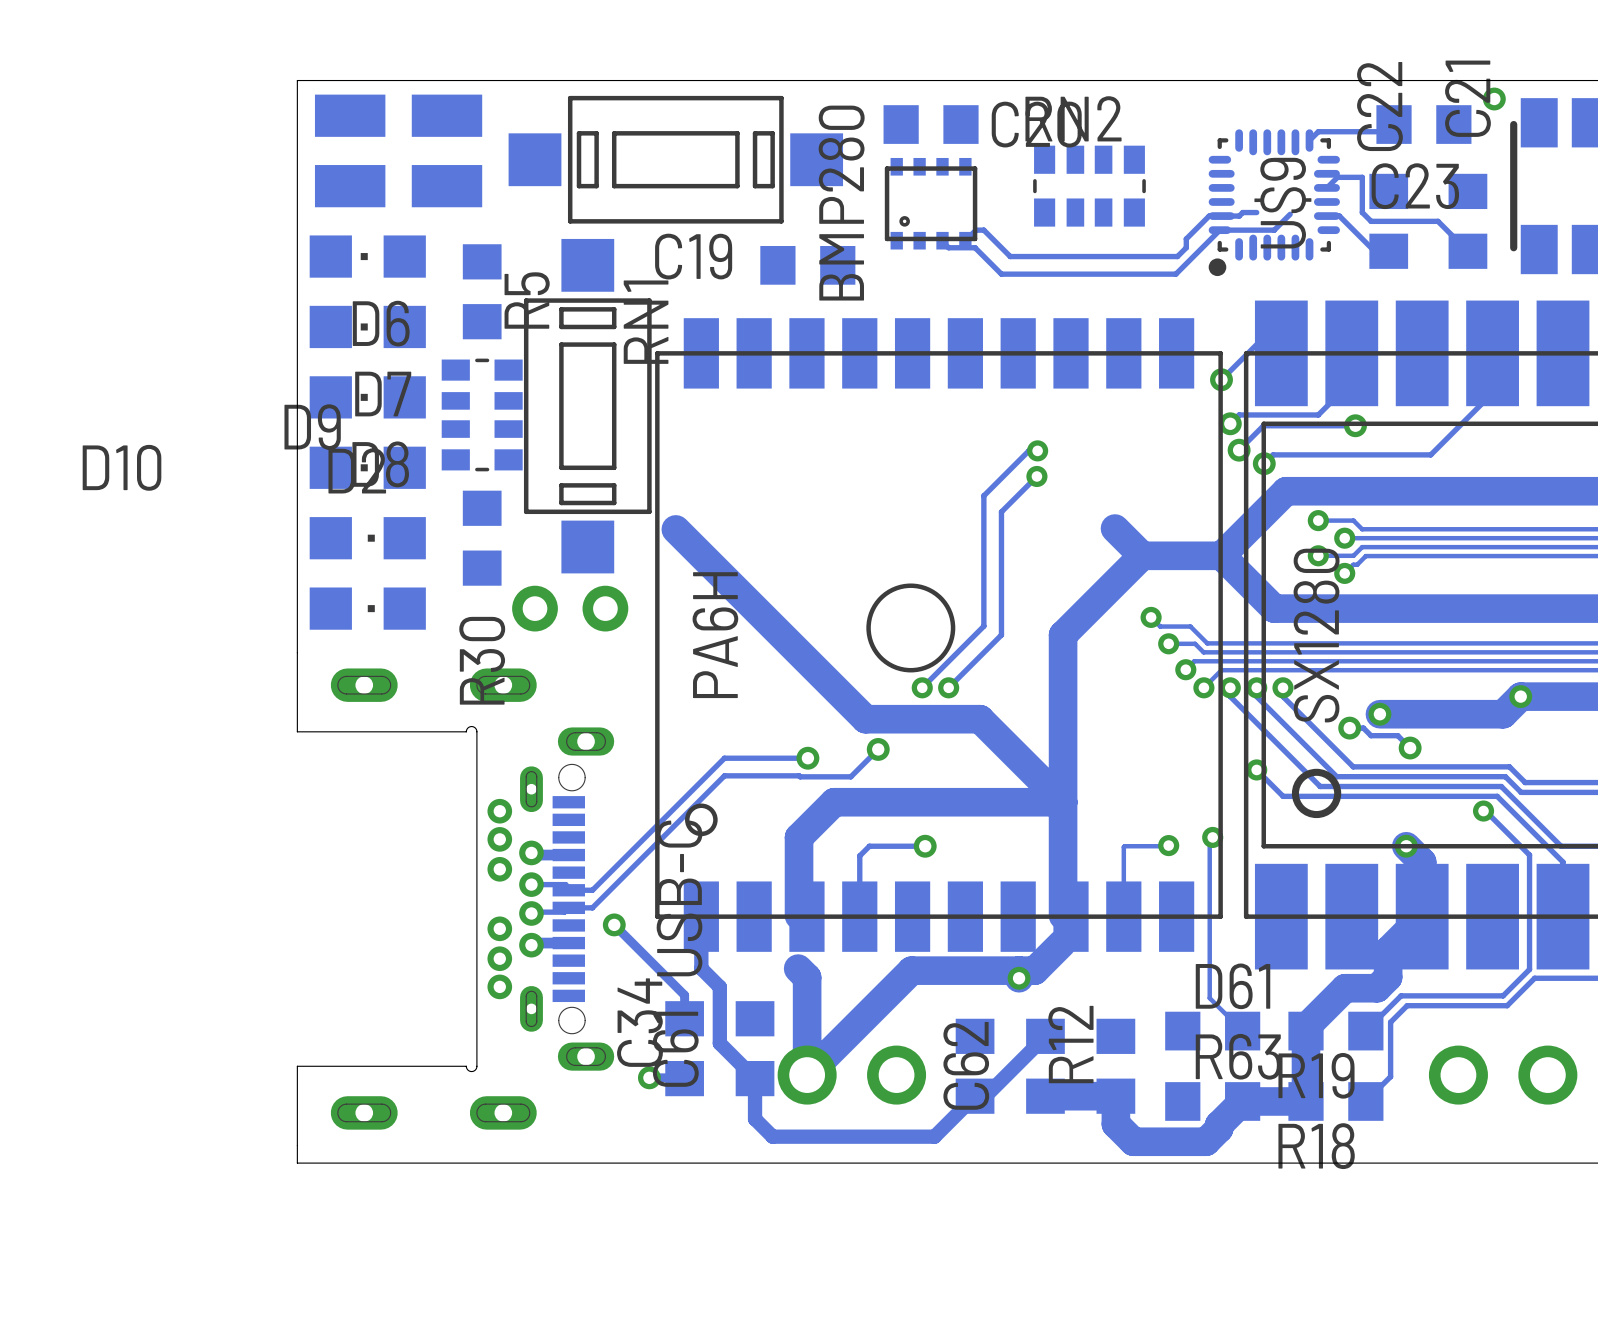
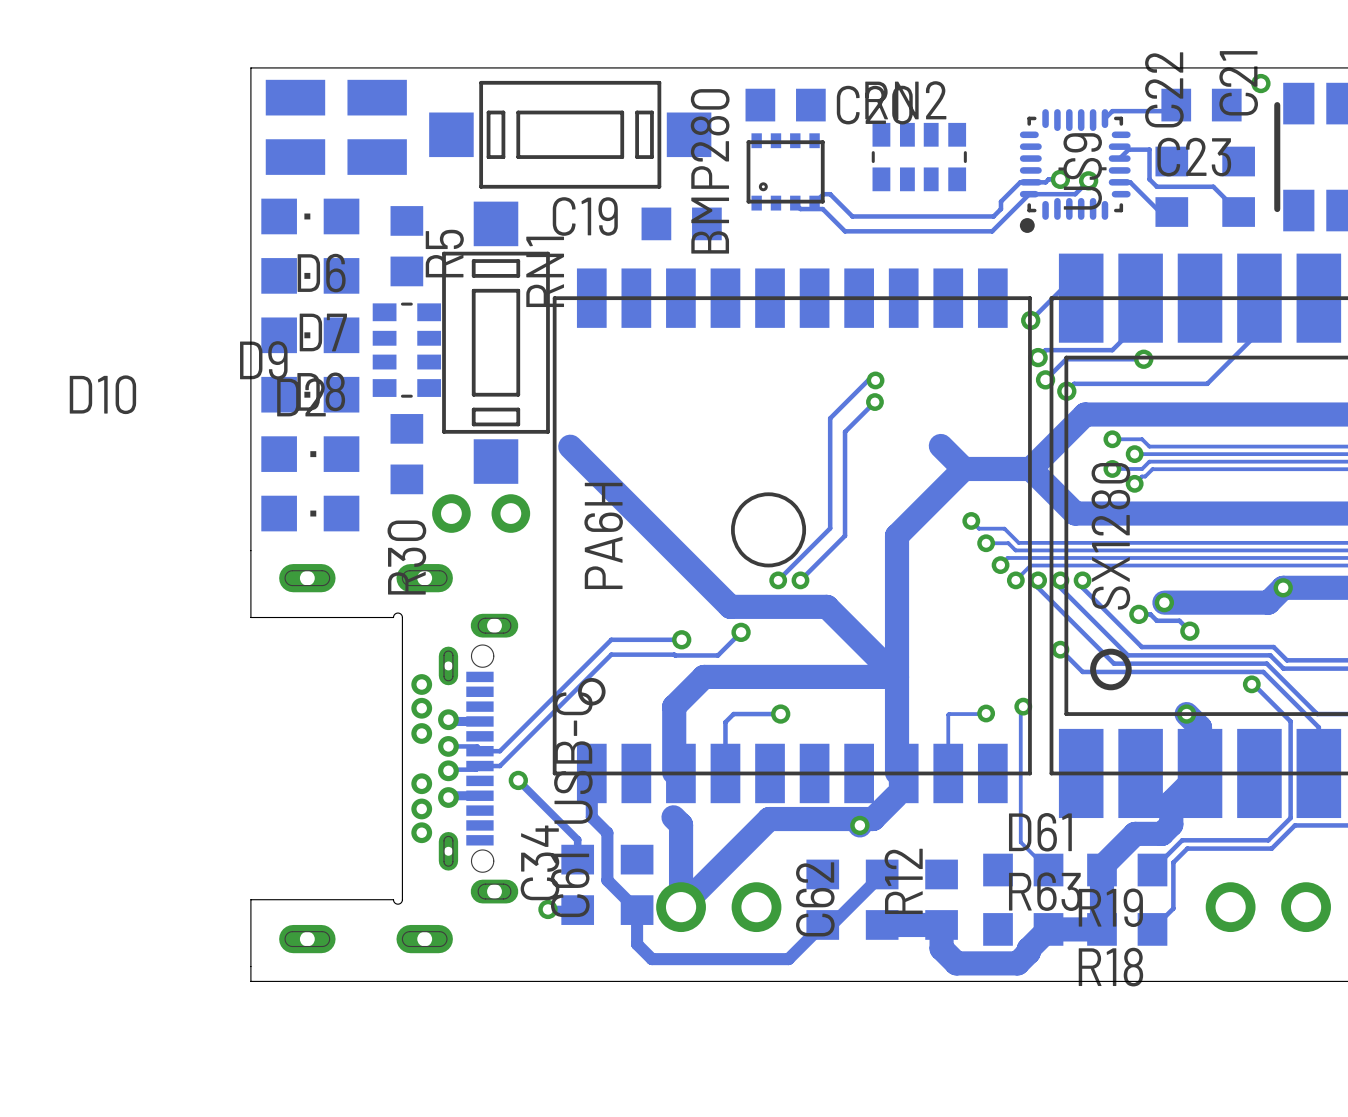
via: none -> (1060, 179)
via: none -> (1088, 180)

